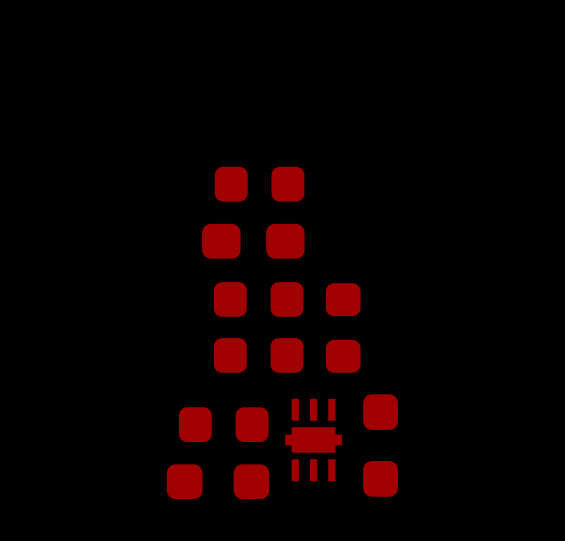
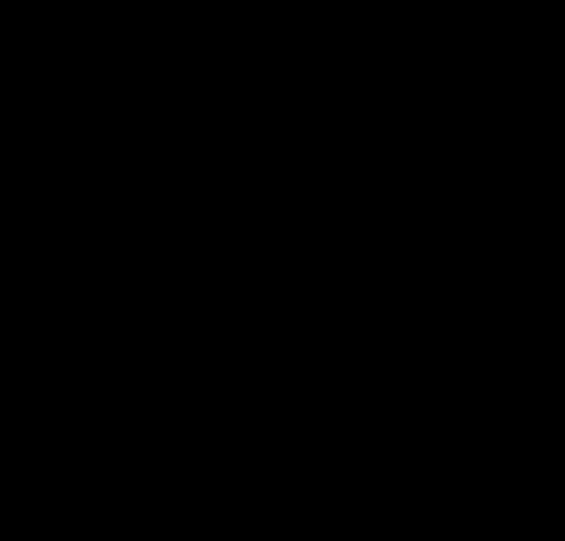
part: (259, 184) -> none
part: (253, 241) -> none
part: (258, 299) -> none
part: (343, 328) -> none
part: (258, 355) -> none
part: (223, 424) -> none
part: (313, 439) -> none
part: (380, 445) -> none
part: (218, 481) -> none

